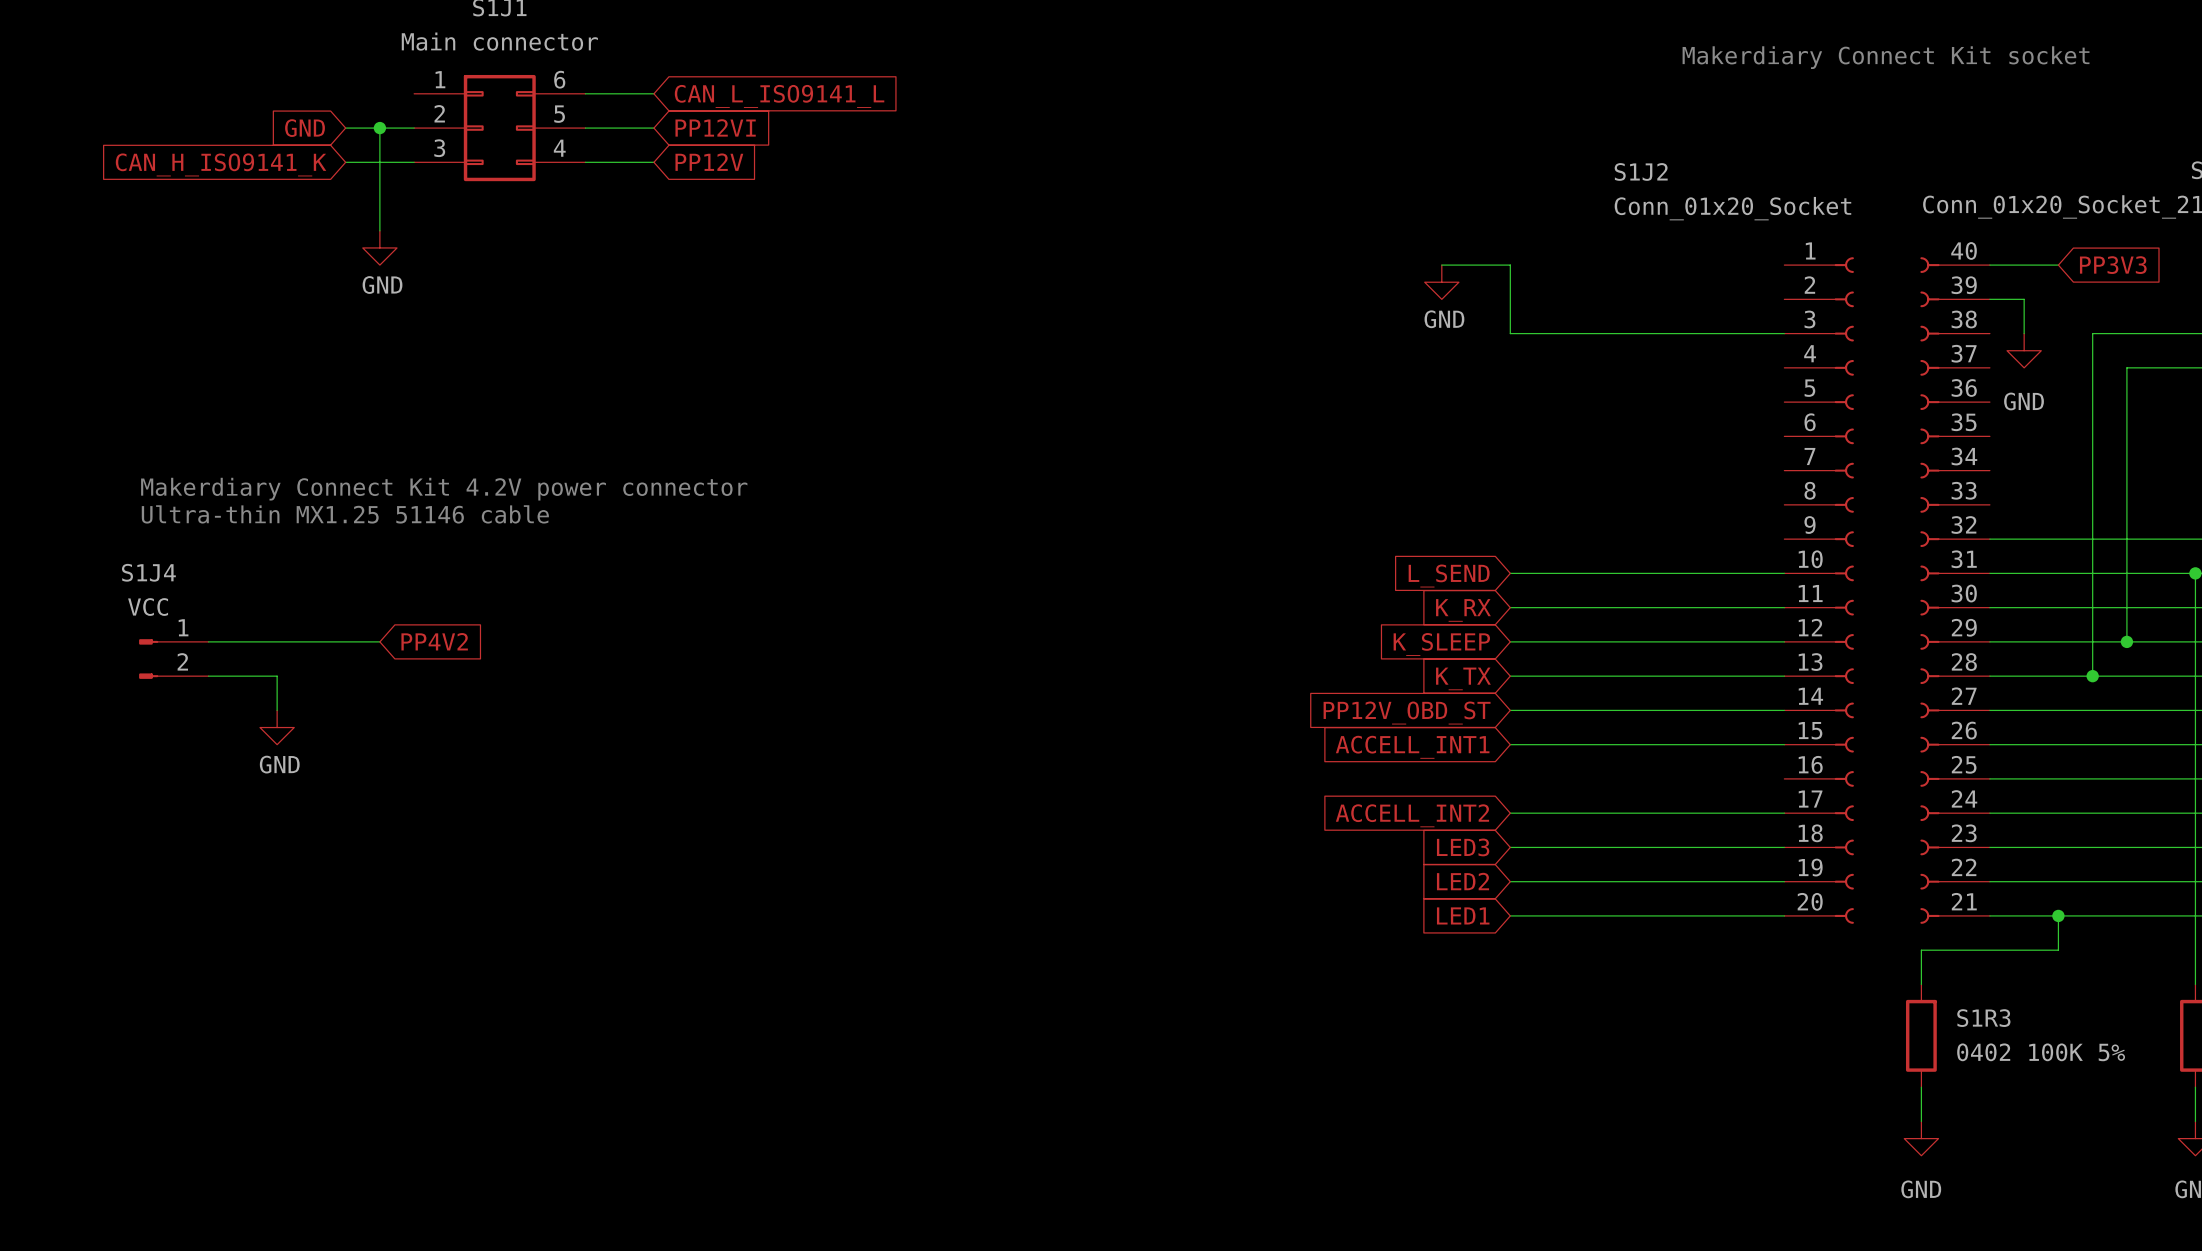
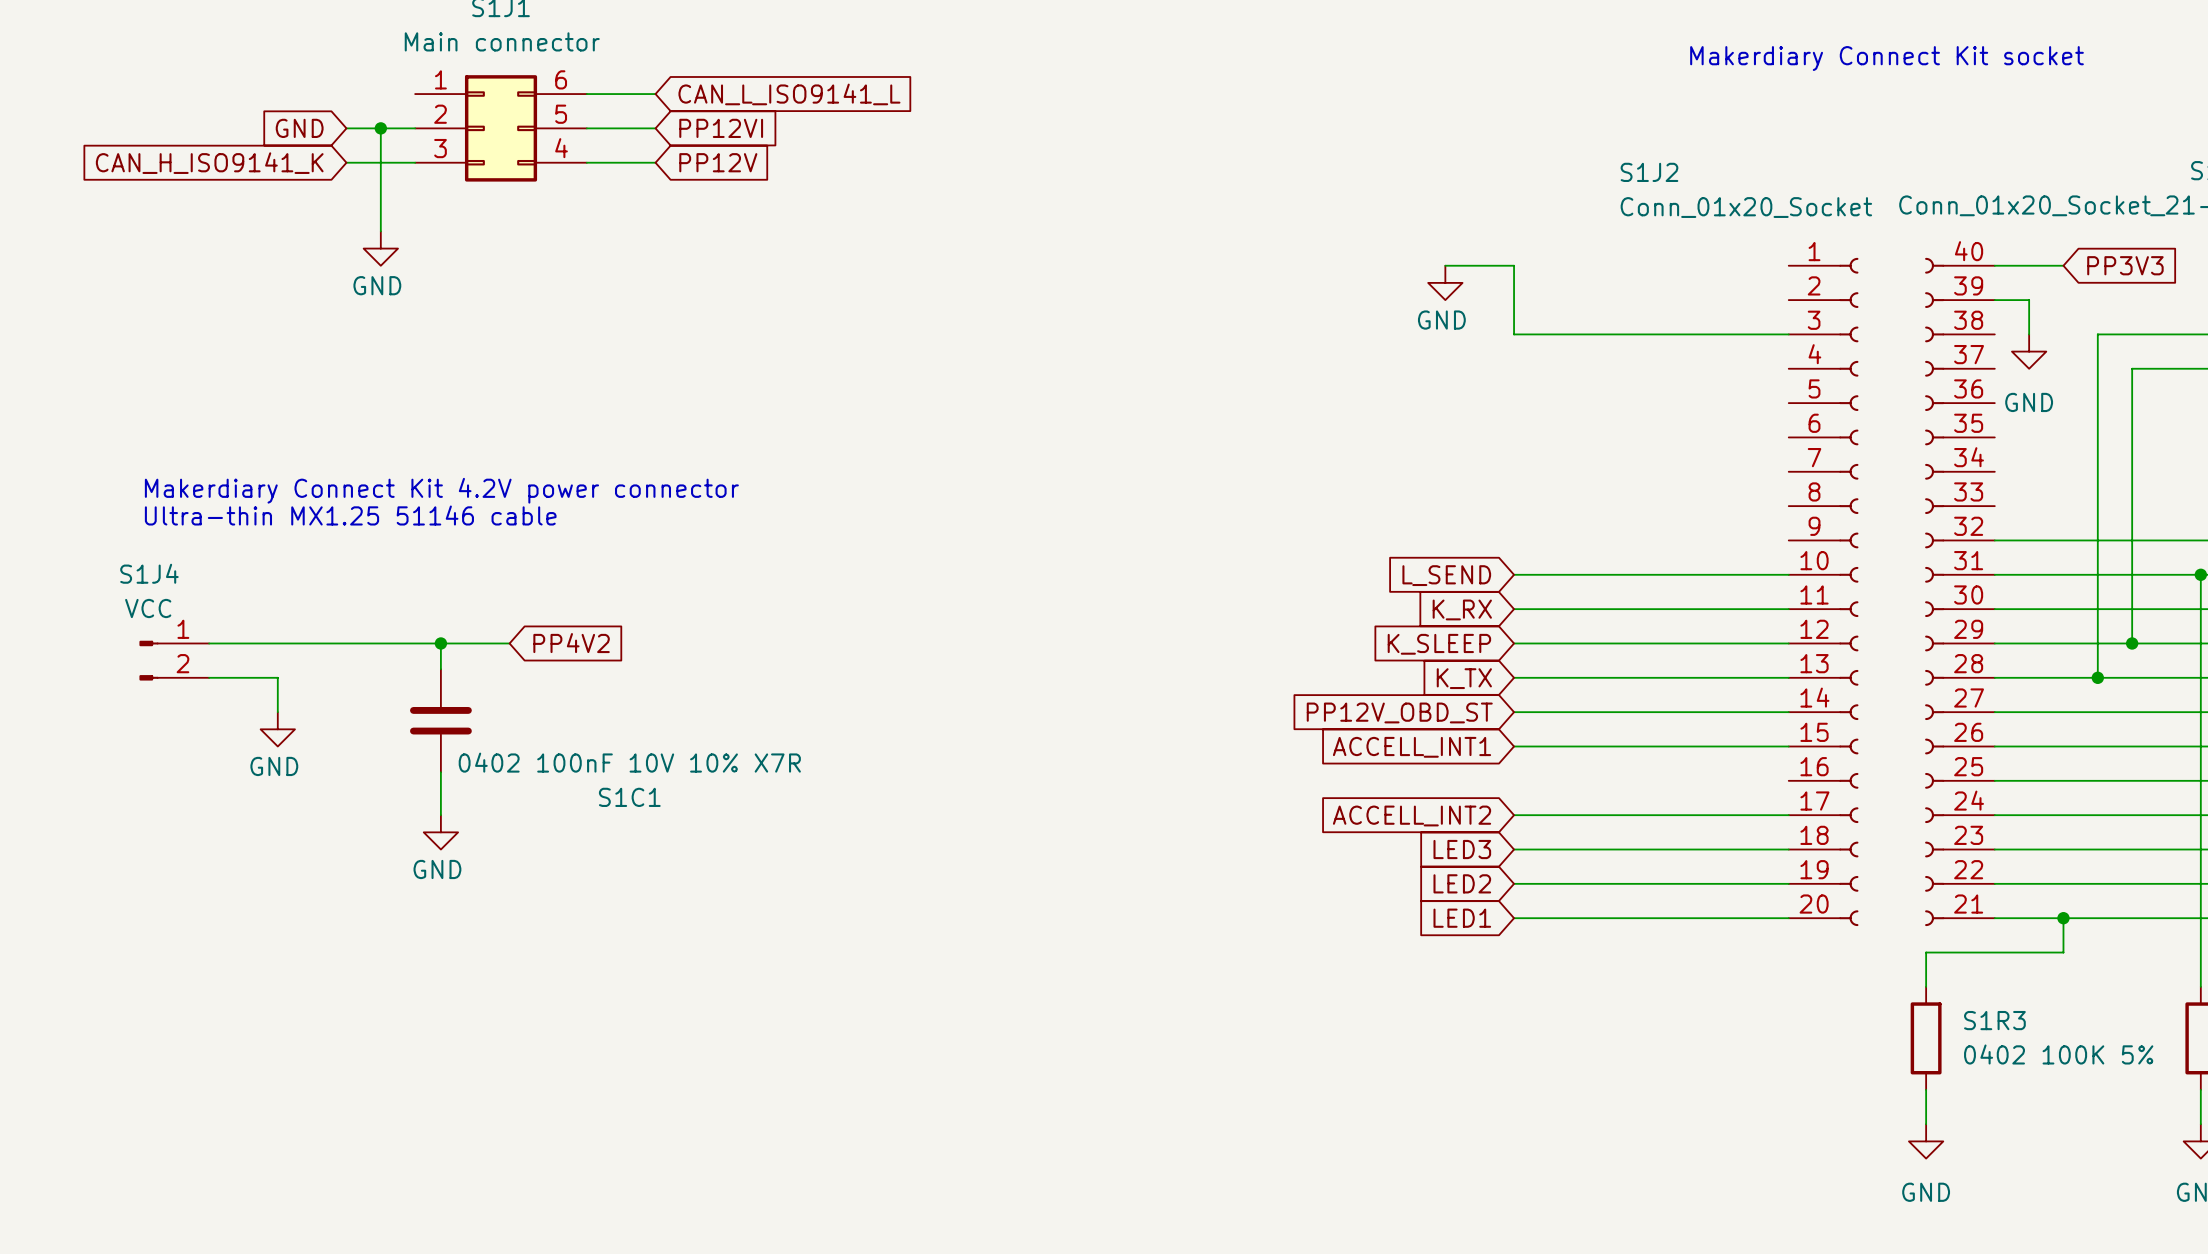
wire: none -> (380, 643) (509, 643)
global label position: PP4V2 (434, 641) -> PP4V2 (571, 643)
wire: none -> (440, 643) (440, 669)
junction: none -> (440, 643)
S1C1: none -> 0402 100nF 10V 10% X7R (440, 720)
wire: none -> (440, 772) (440, 815)
power symbol: none -> GND (440, 832)

